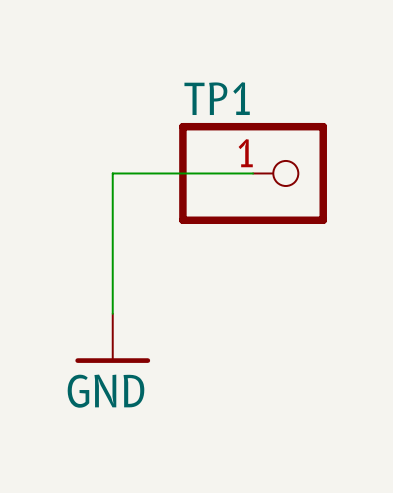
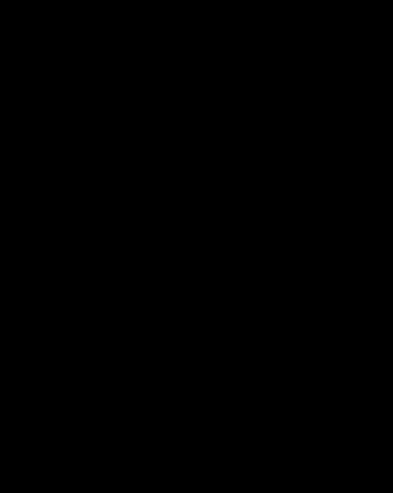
wire: (253, 173) (112, 173) (112, 313) -> none
TP1: (253, 173) -> none
power symbol: GND (112, 338) -> none

